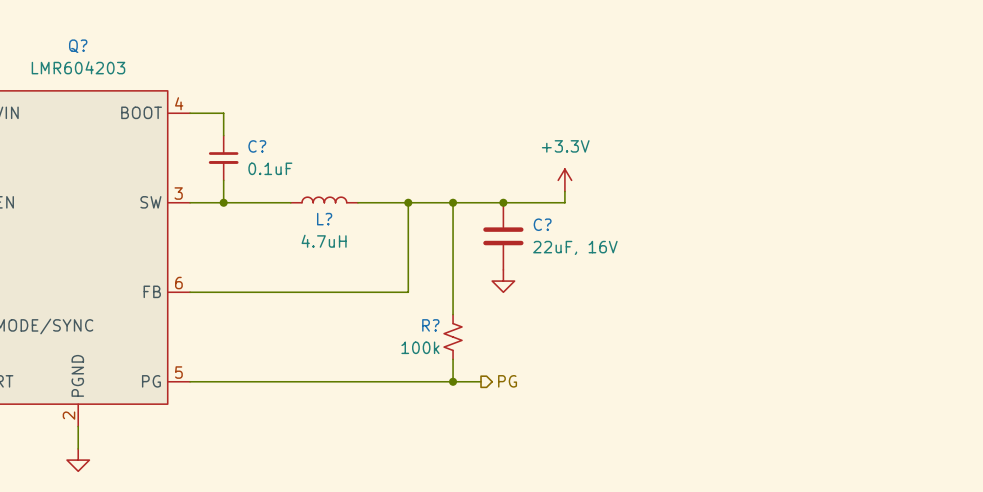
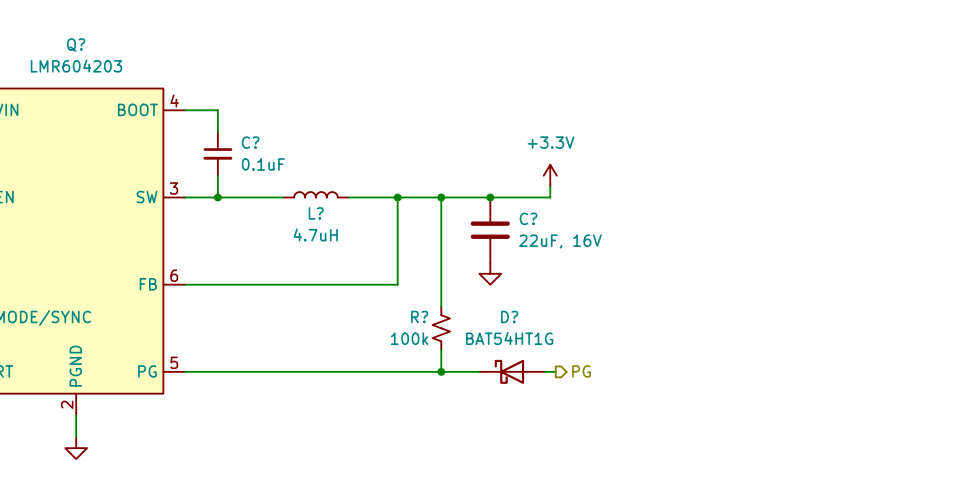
wire: none -> (468, 371) (479, 371)
hierarchical label position: PG (507, 381) -> PG (581, 371)
D?: none -> BAT54HT1G (512, 371)
wire: none -> (544, 371) (555, 371)

